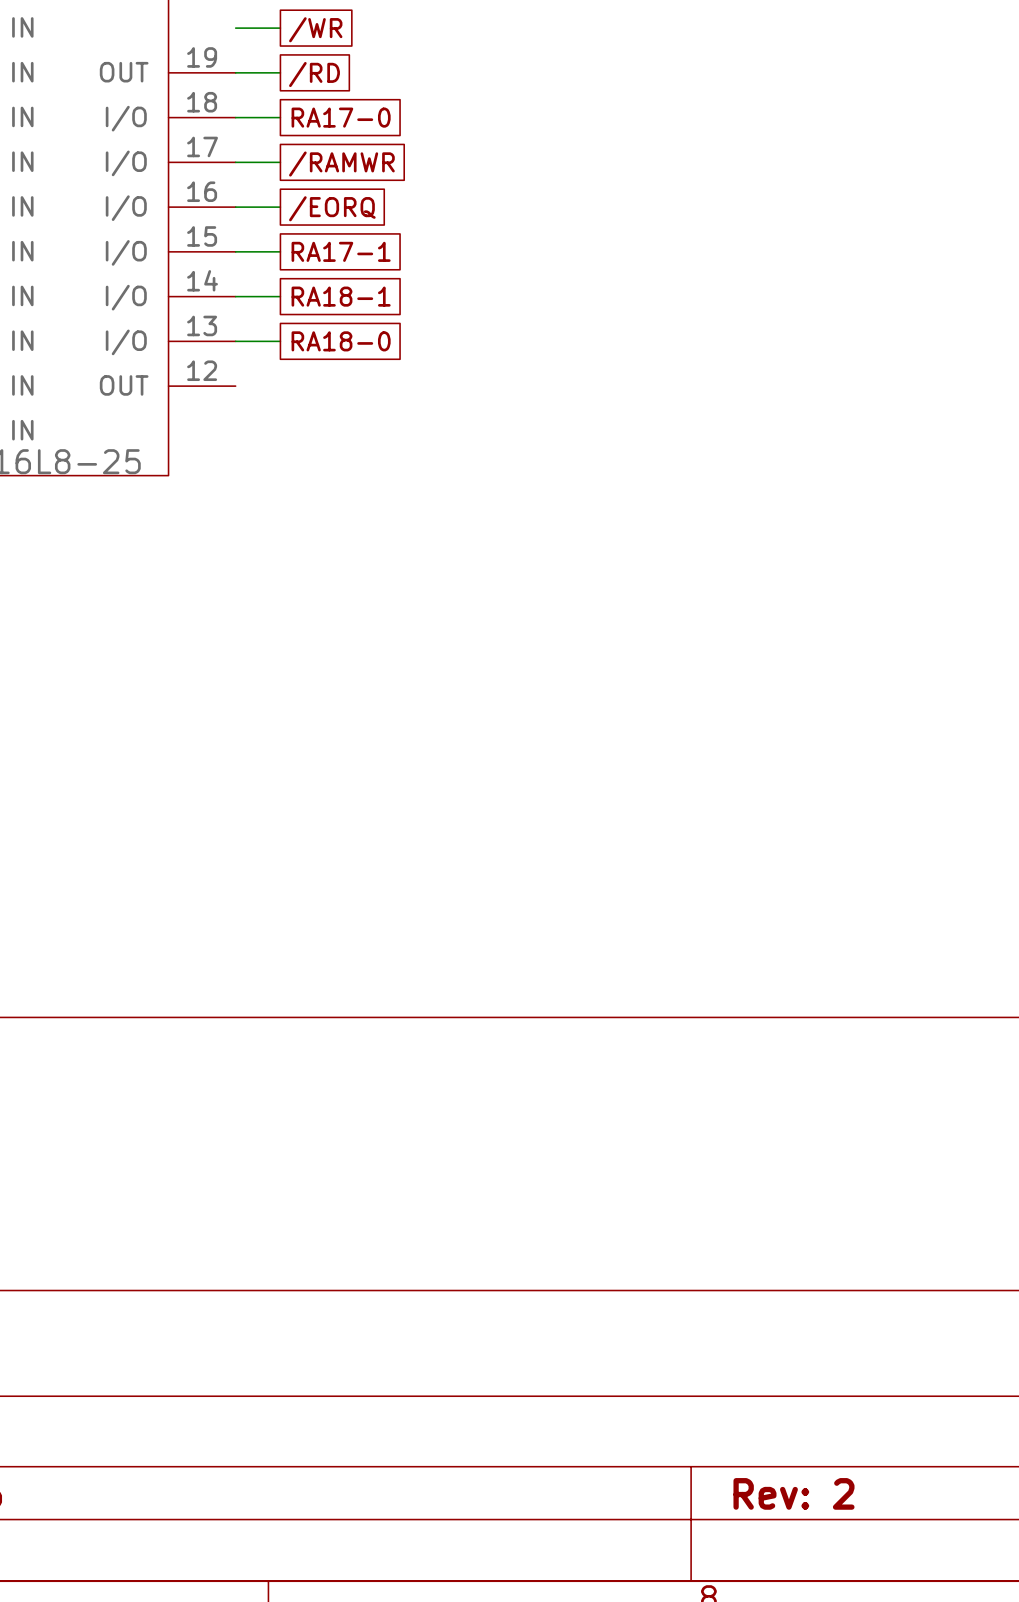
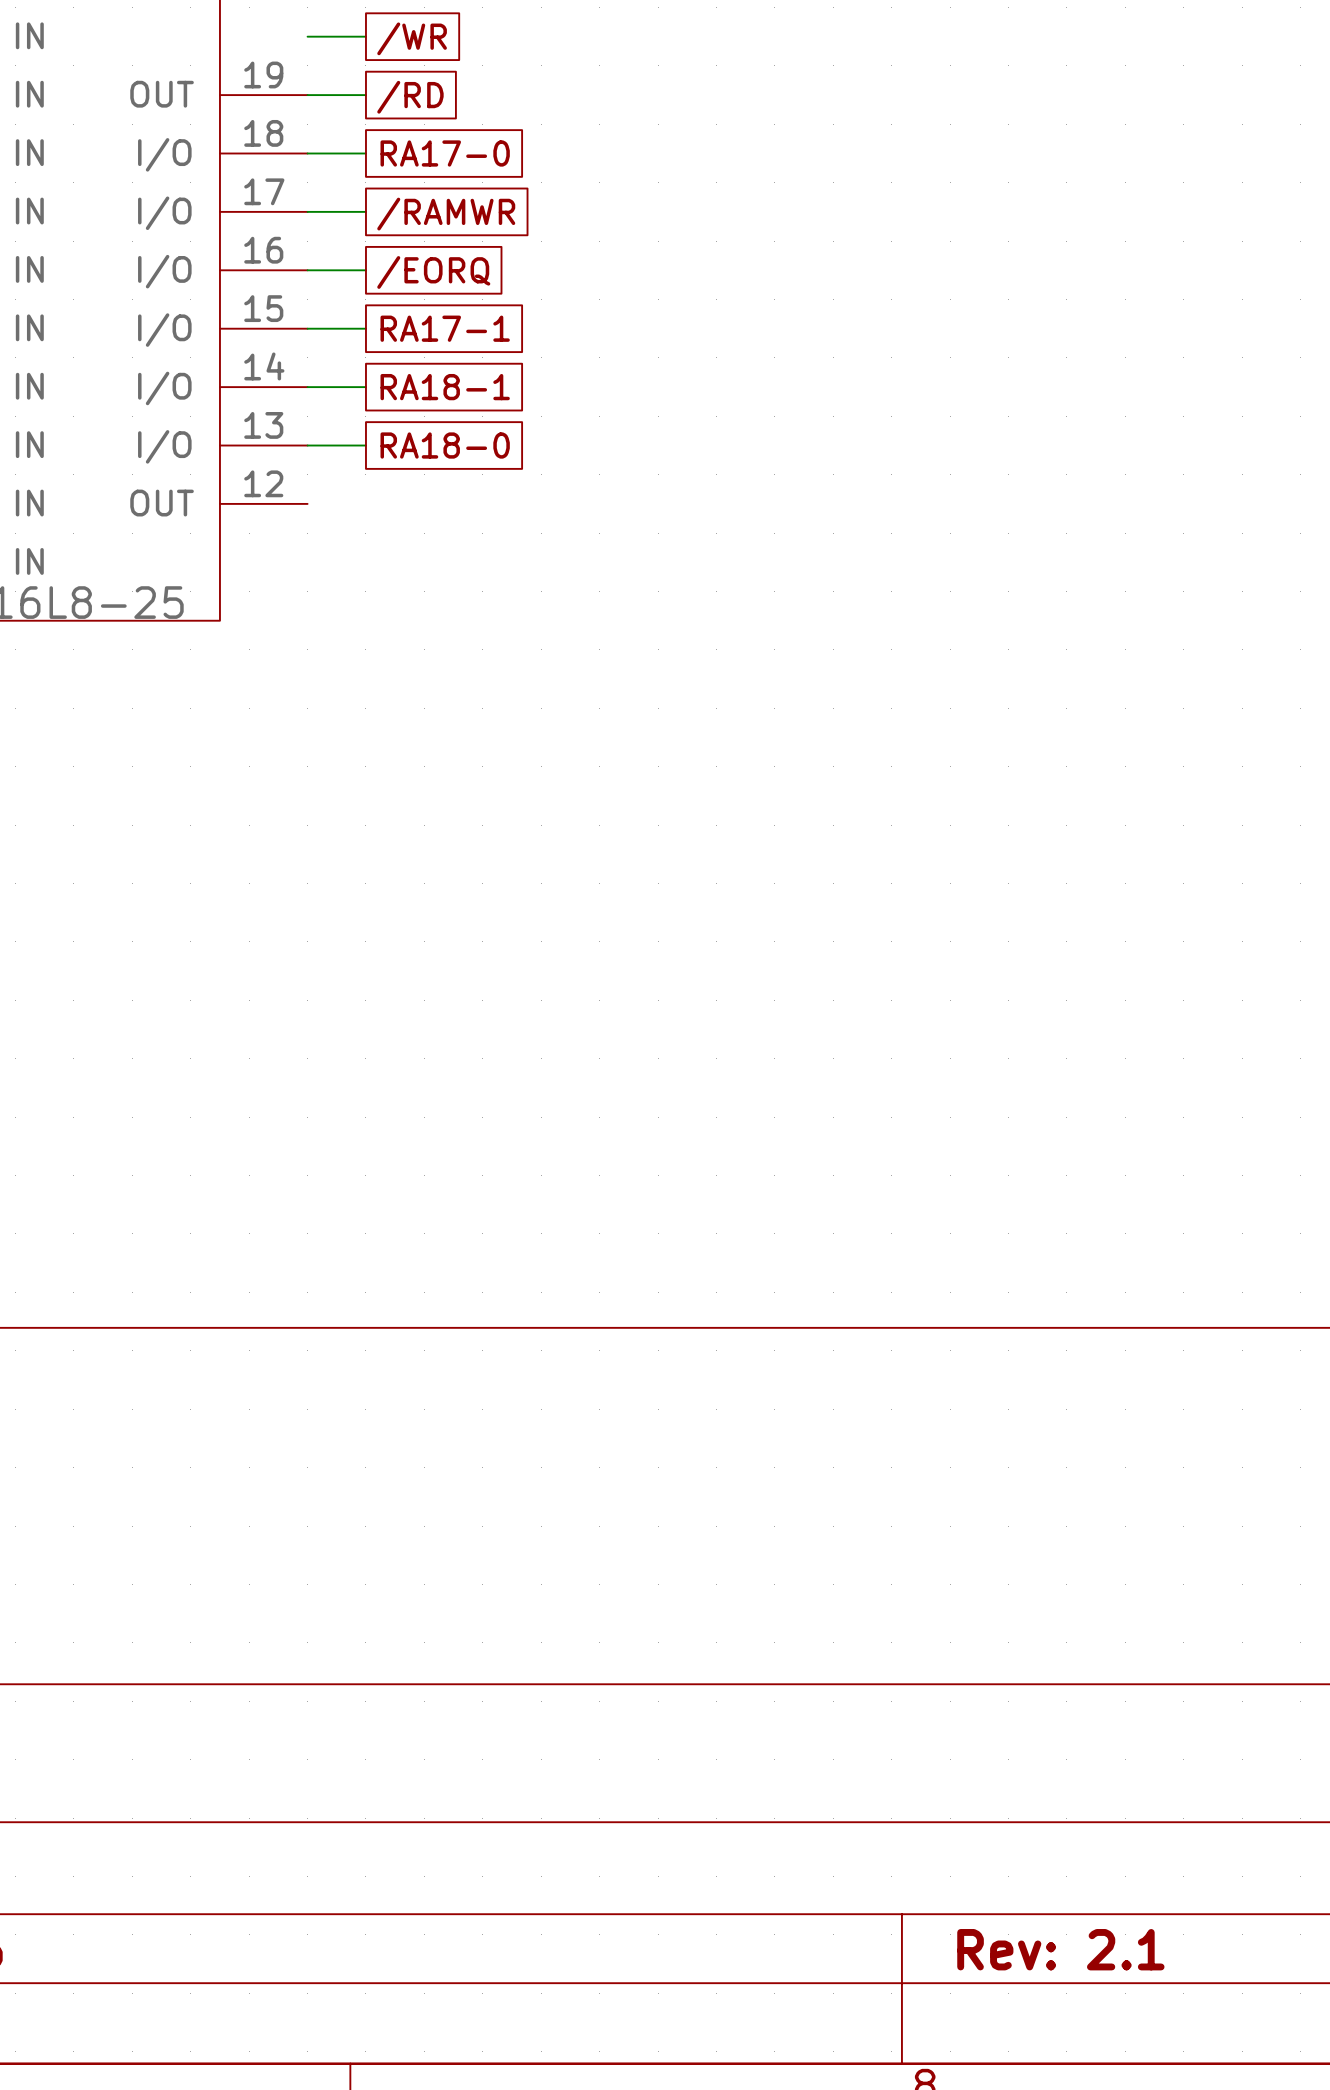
title block: Rev: 2 (793, 1493) -> Rev: 2.1 (1060, 1949)

